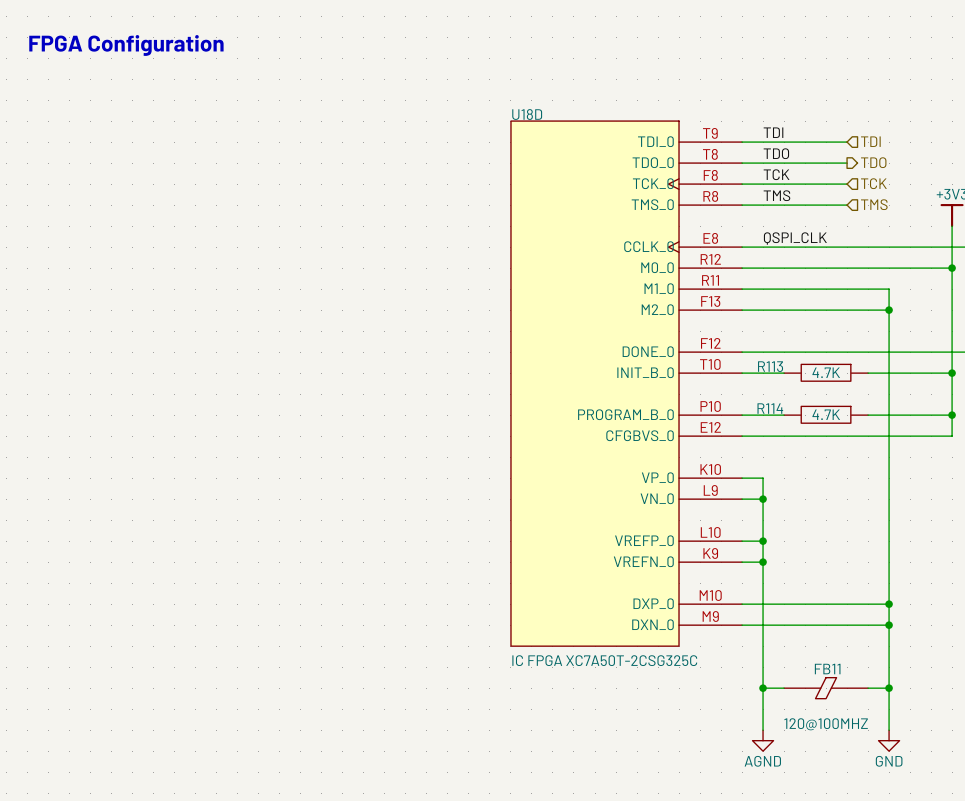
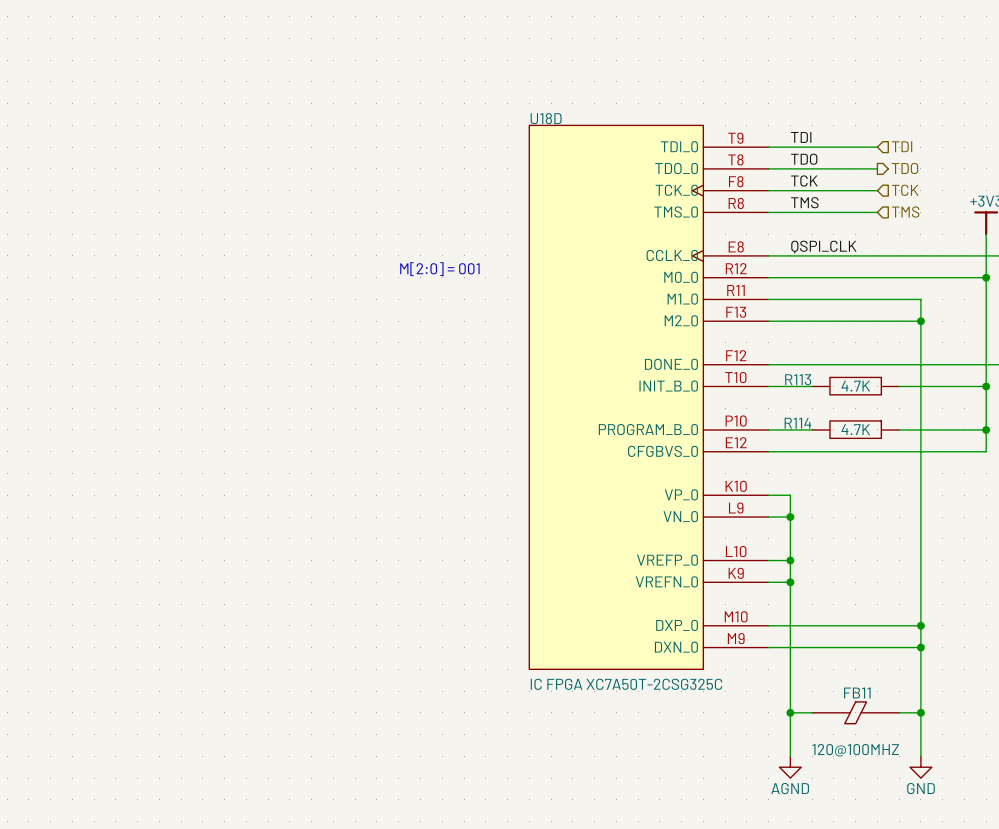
text: FPGA Configuration (126, 45) -> none
text: none -> M[2:0] = 001 (439, 269)

